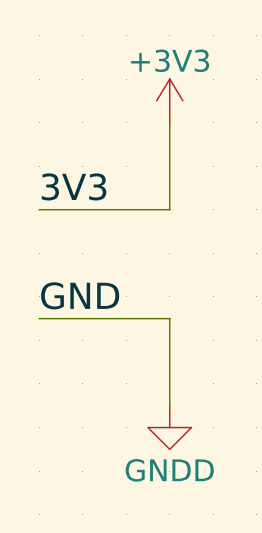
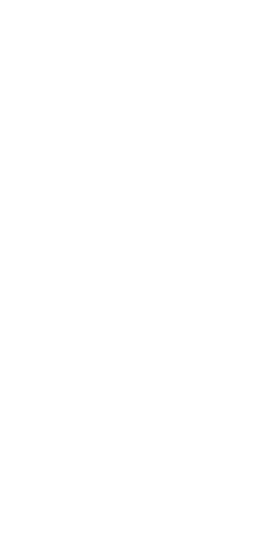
power symbol: +3V3 (169, 100) -> none
wire: (169, 122) (169, 209) (39, 209) -> none
label: 3V3 (74, 186) -> none
label: GND (80, 295) -> none
wire: (39, 318) (169, 318) (169, 405) -> none
power symbol: GNDD (169, 427) -> none

